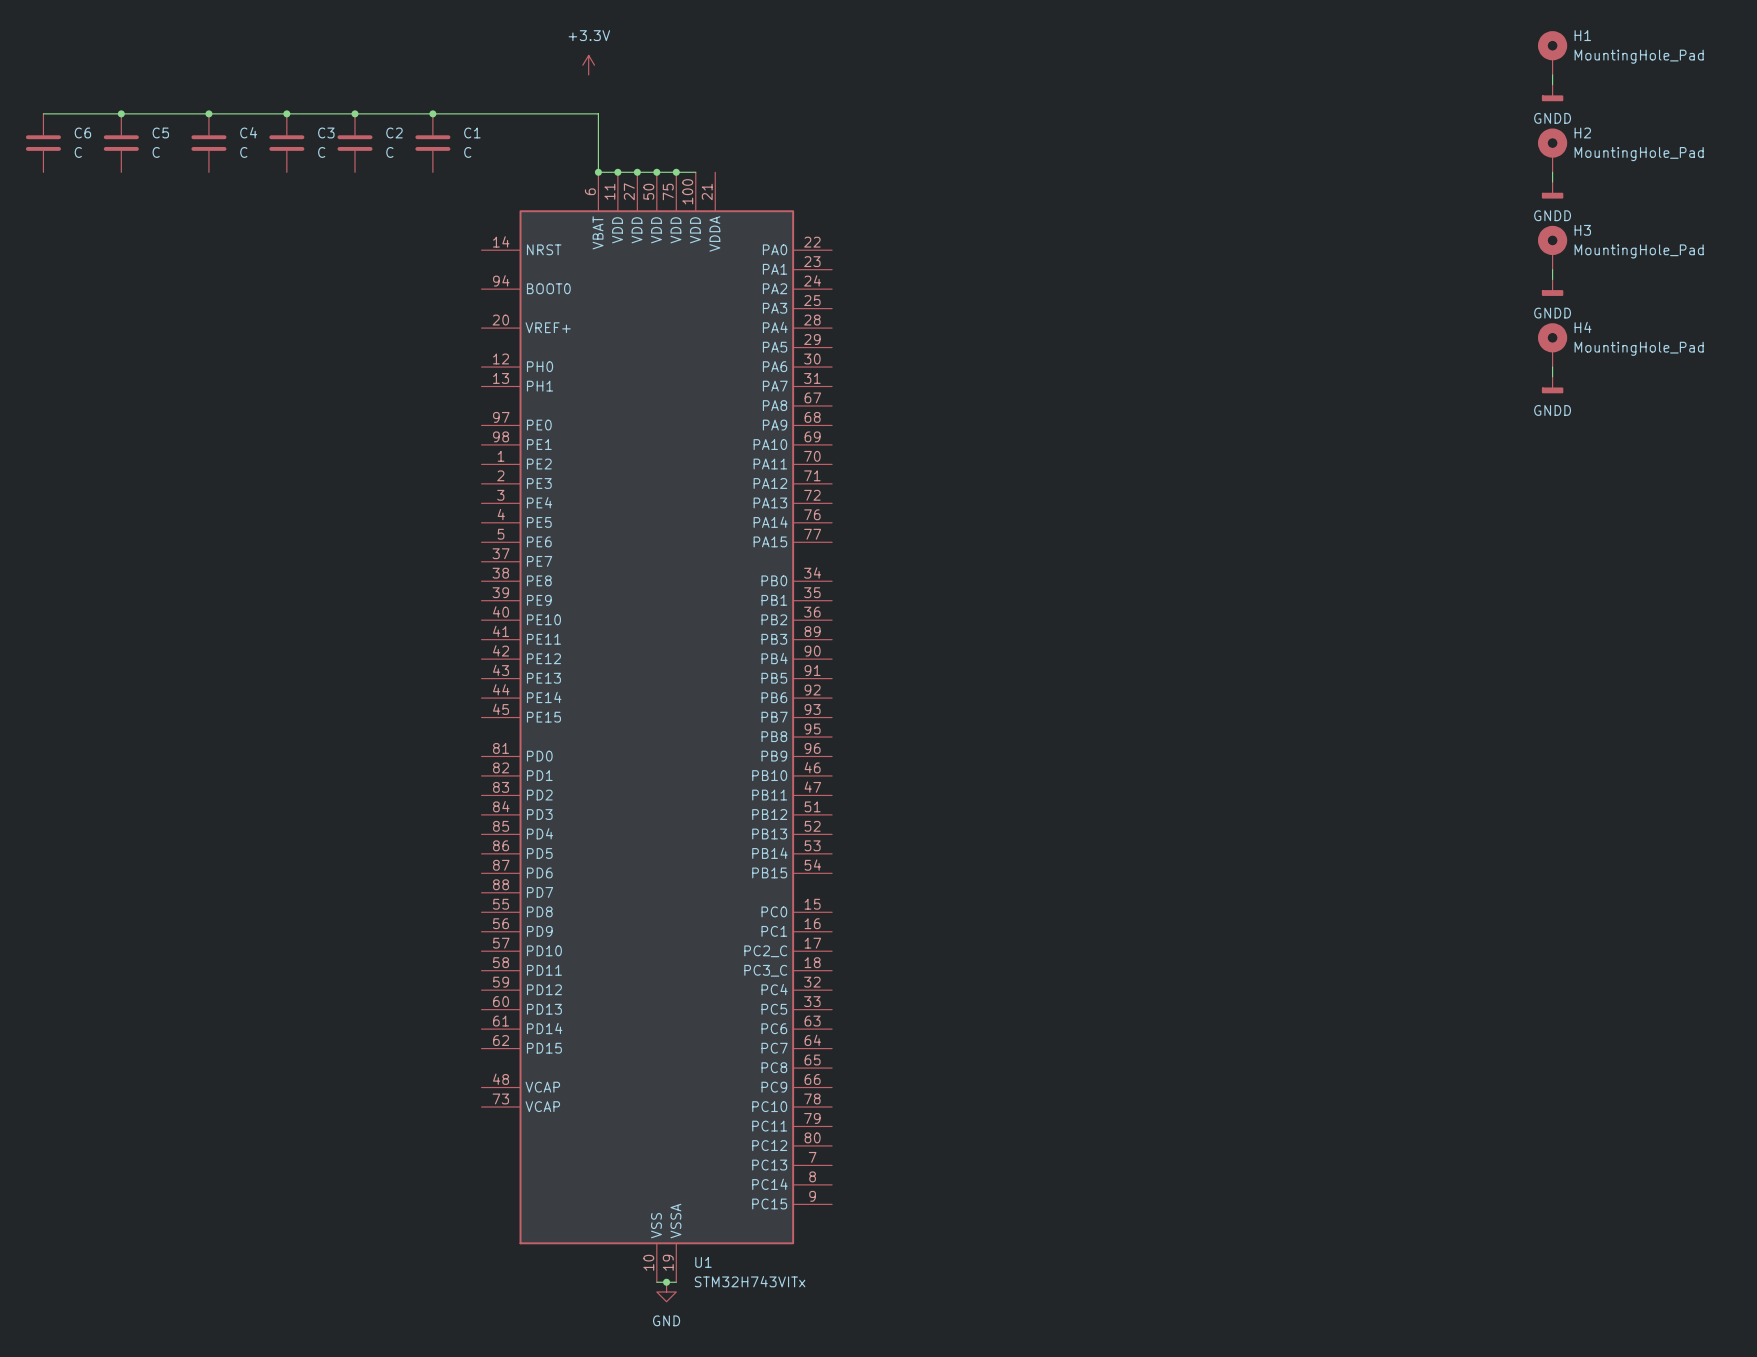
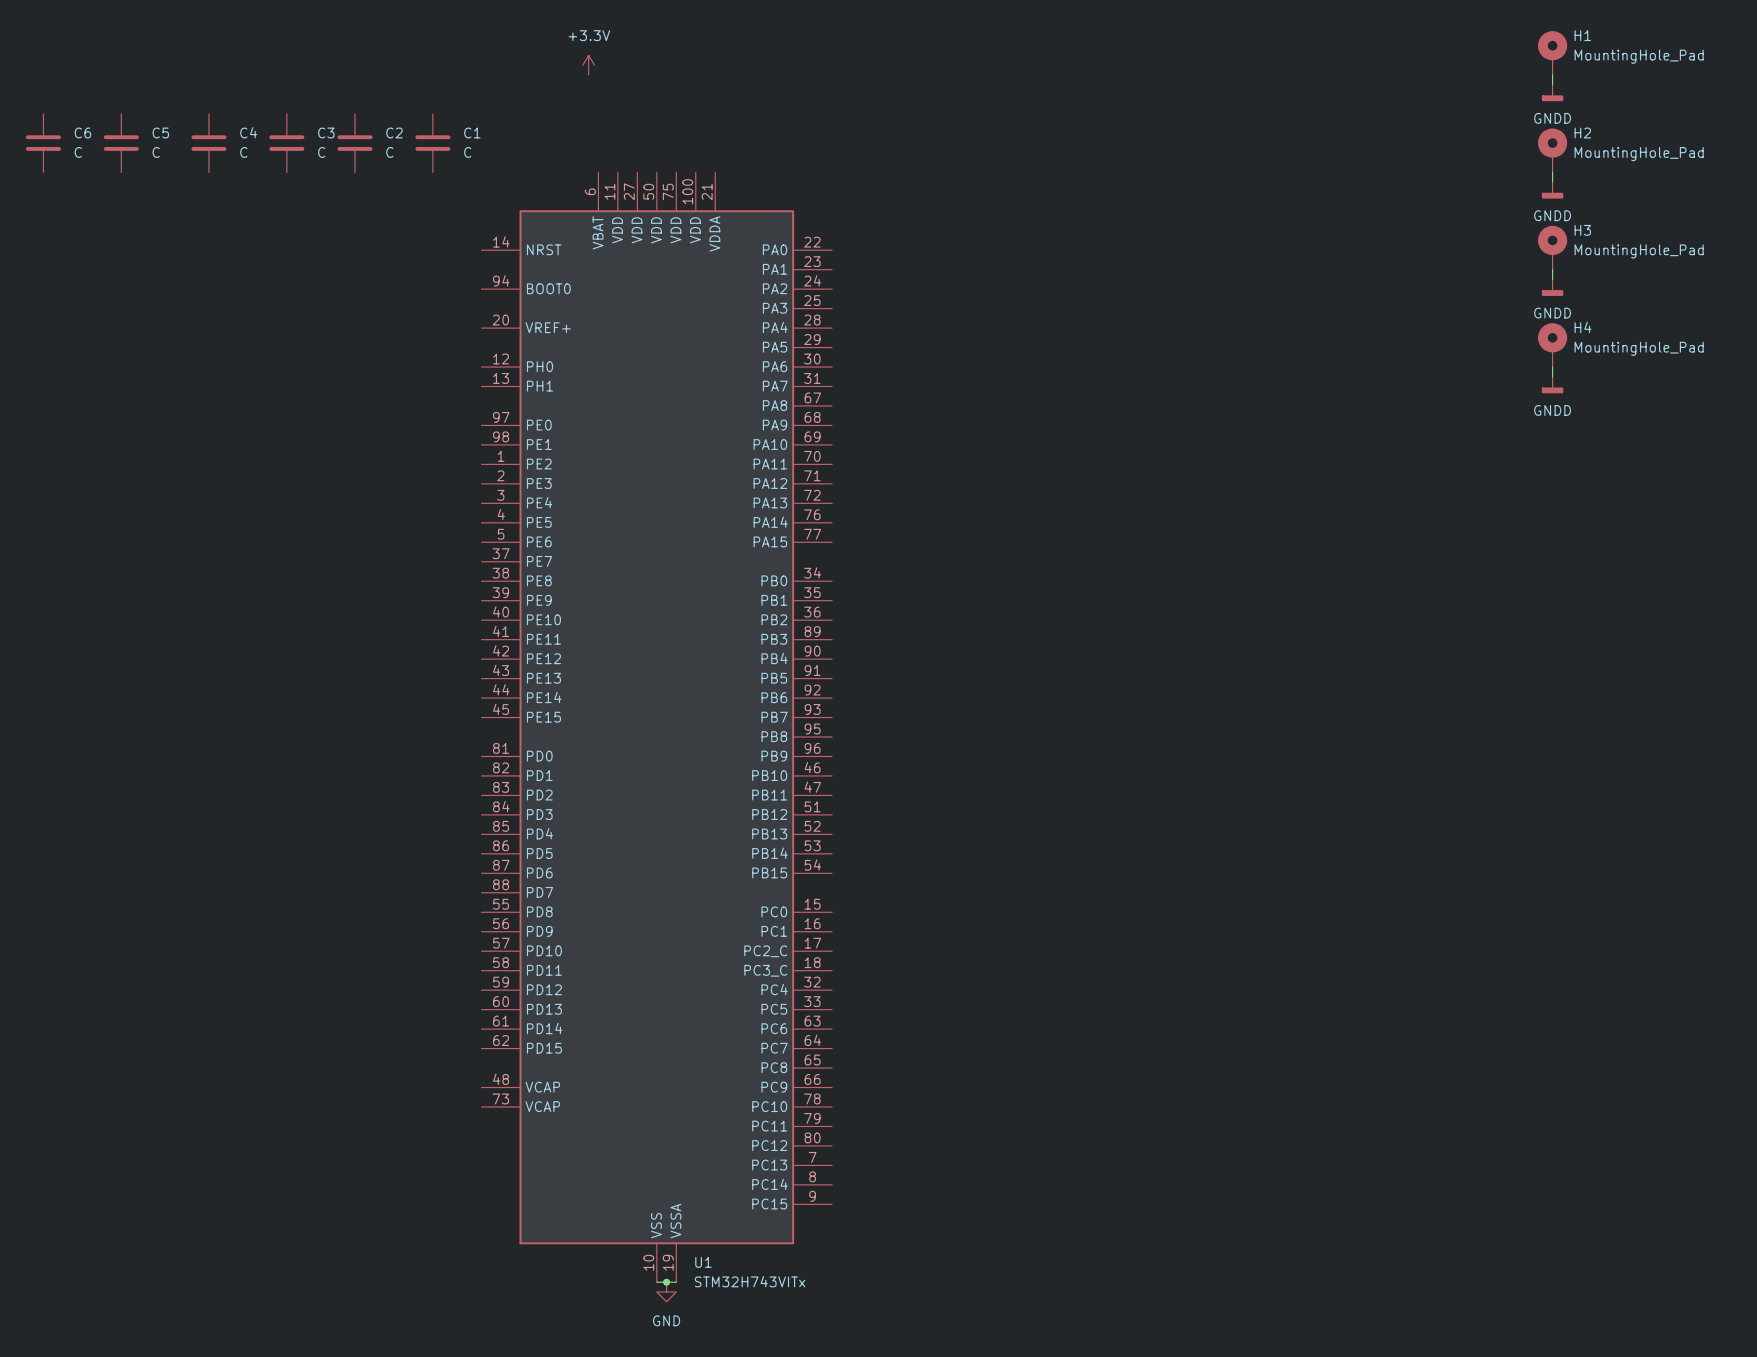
wire: (43, 113) (598, 113) (598, 172) (695, 172) -> none
junction: (121, 113) -> none
junction: (208, 113) -> none
junction: (286, 113) -> none
junction: (354, 113) -> none
junction: (432, 113) -> none
junction: (598, 172) -> none
junction: (617, 172) -> none
junction: (637, 172) -> none
junction: (656, 172) -> none
junction: (676, 172) -> none

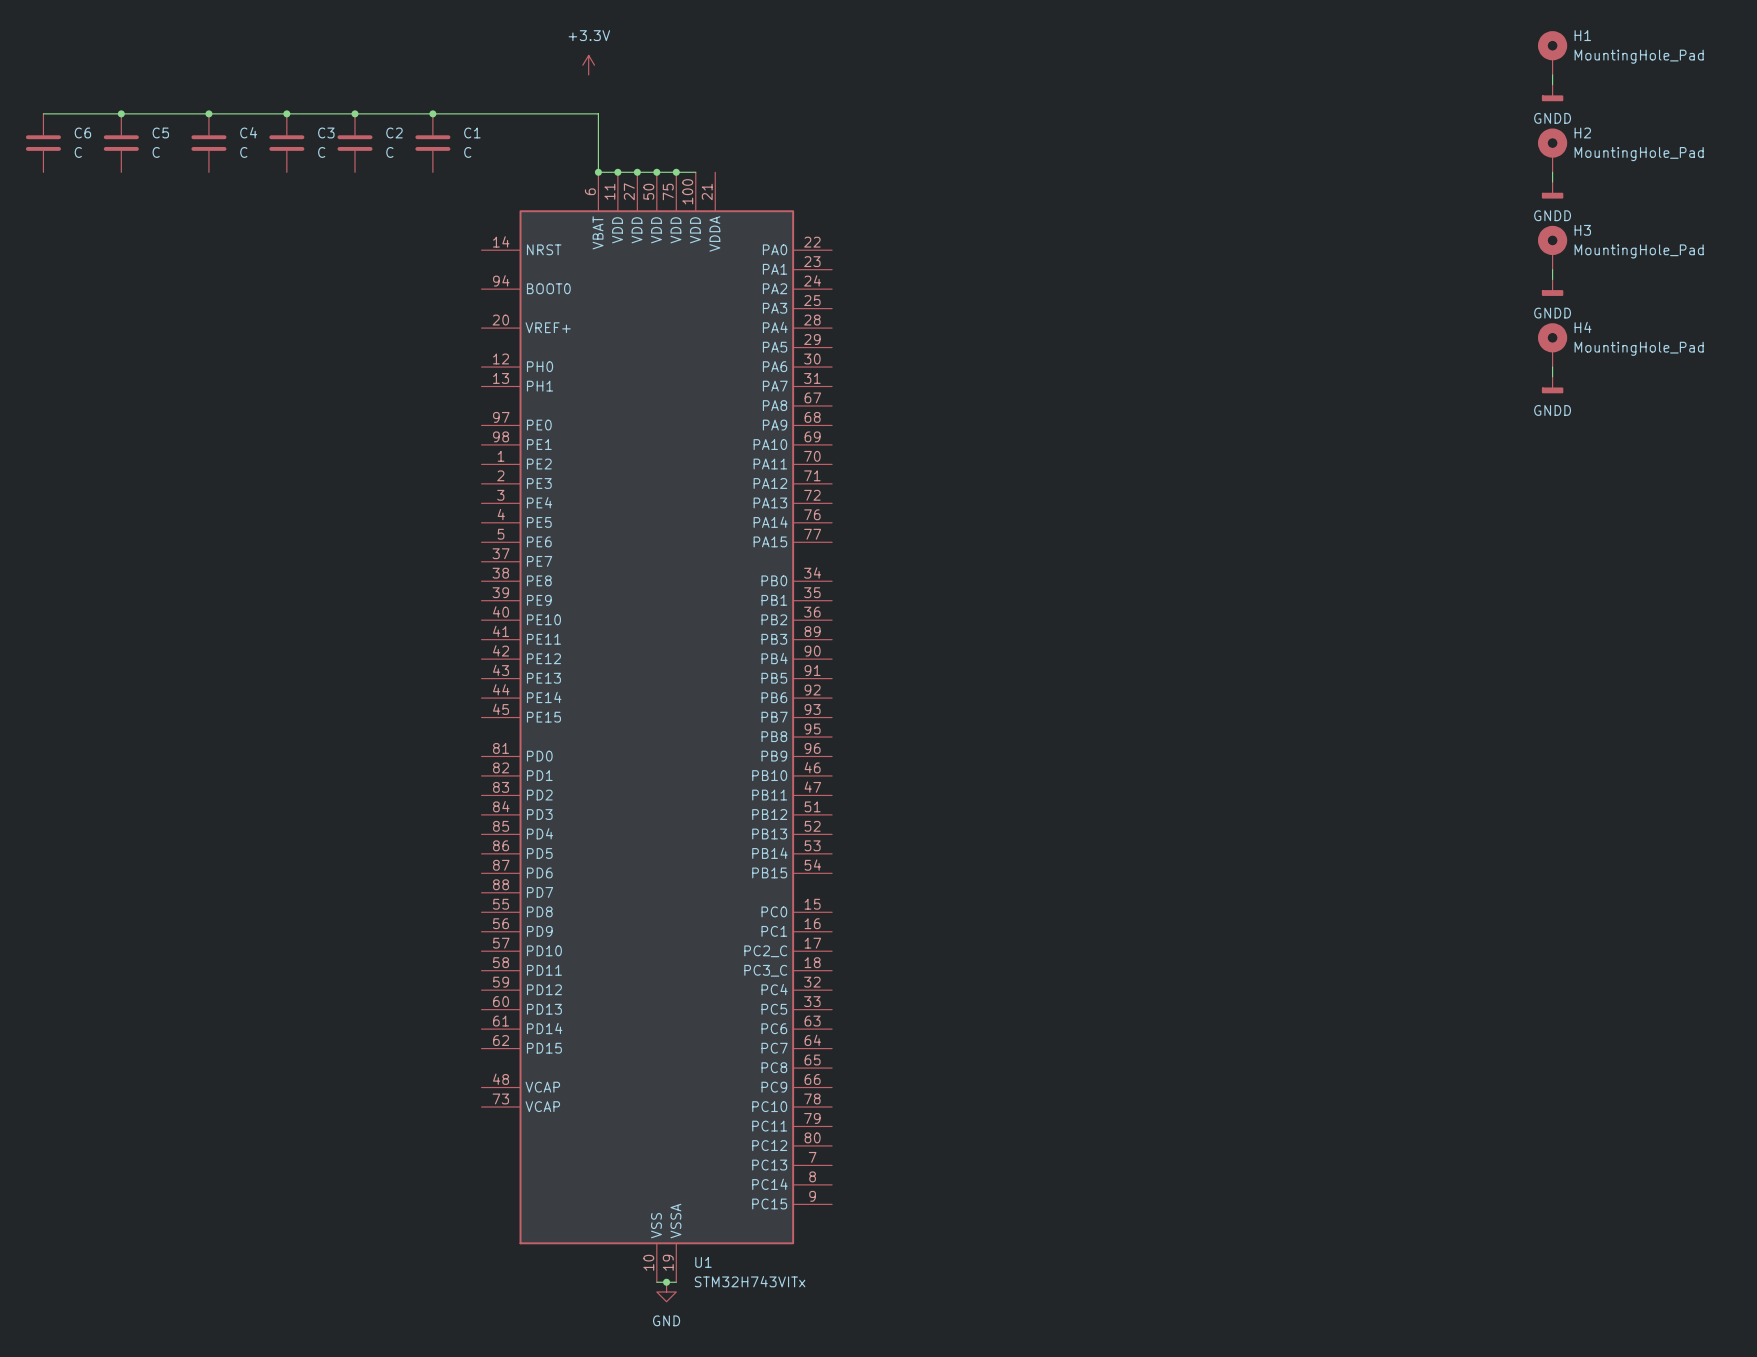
wire: none -> (43, 113) (598, 113) (598, 172) (695, 172)
junction: none -> (121, 113)
junction: none -> (208, 113)
junction: none -> (286, 113)
junction: none -> (354, 113)
junction: none -> (432, 113)
junction: none -> (598, 172)
junction: none -> (617, 172)
junction: none -> (637, 172)
junction: none -> (656, 172)
junction: none -> (676, 172)

